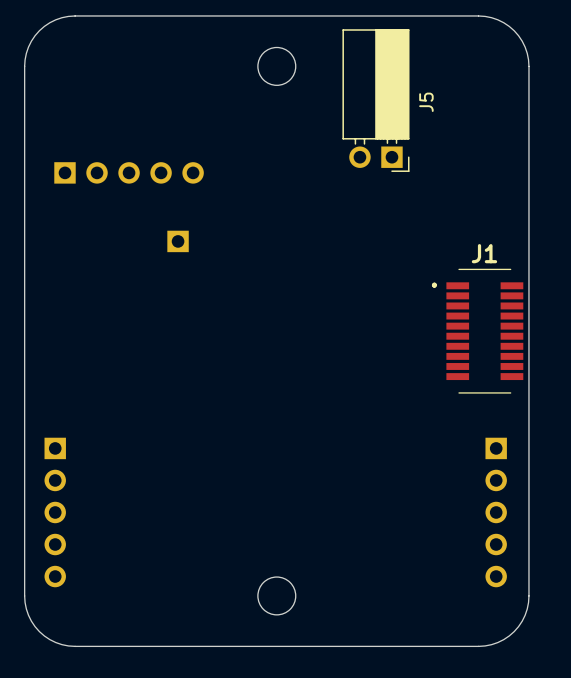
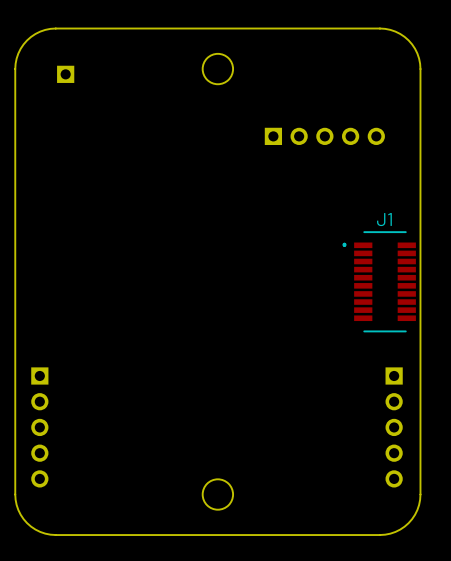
J5: (375, 100) -> none
part position: (129, 172) -> (324, 136)
part position: (178, 241) -> (65, 74)

